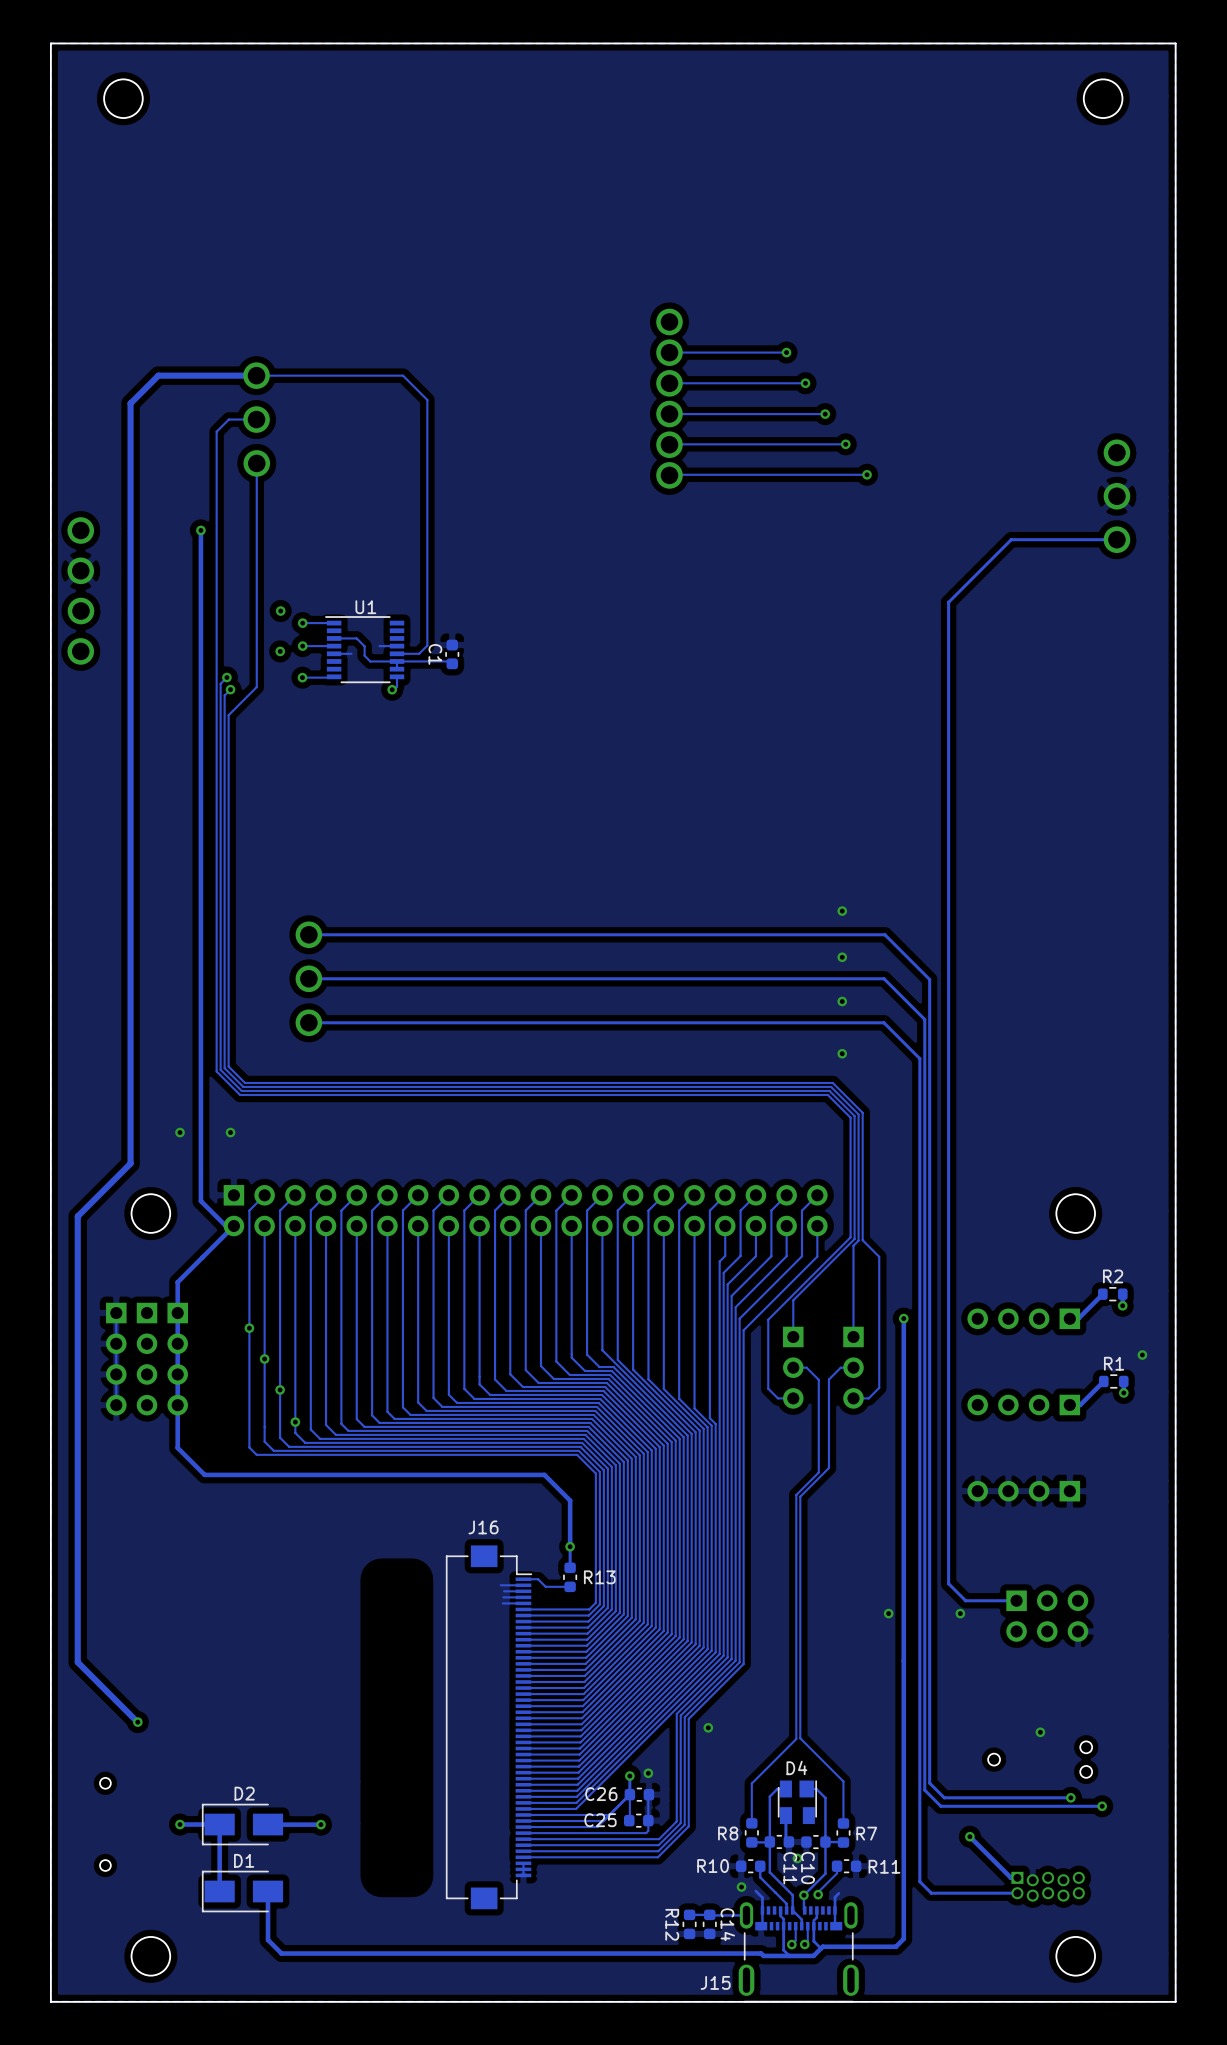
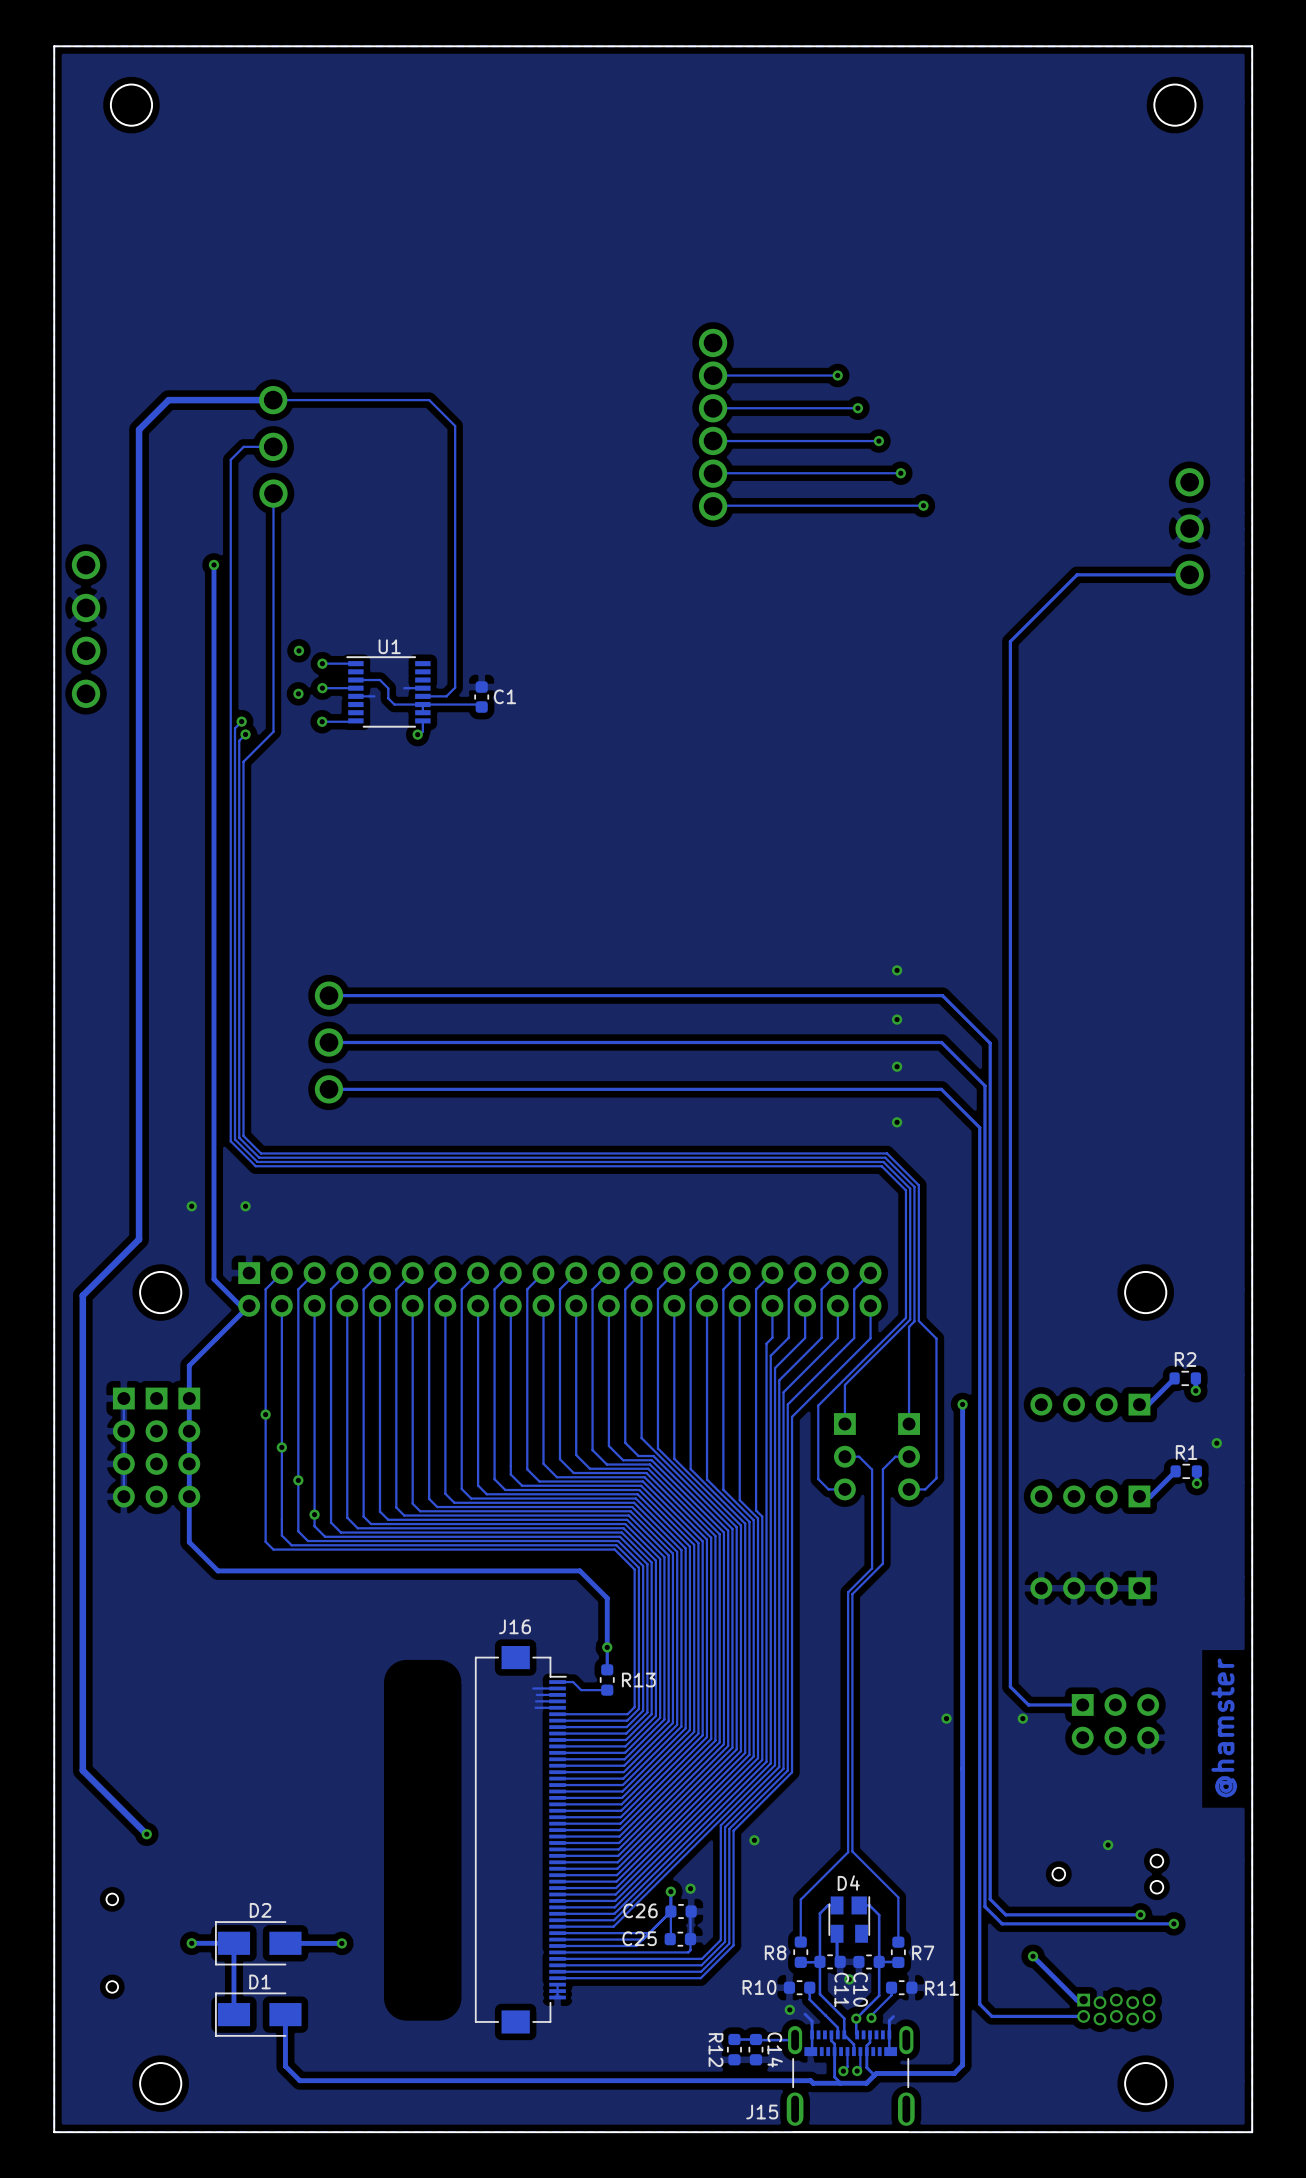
C1 name rotation: 0° (435, 654) -> 90° counterclockwise (505, 696)
C1 name position: C1 (435, 654) -> C1 (505, 696)
text: none -> @hamster (1224, 1727)

